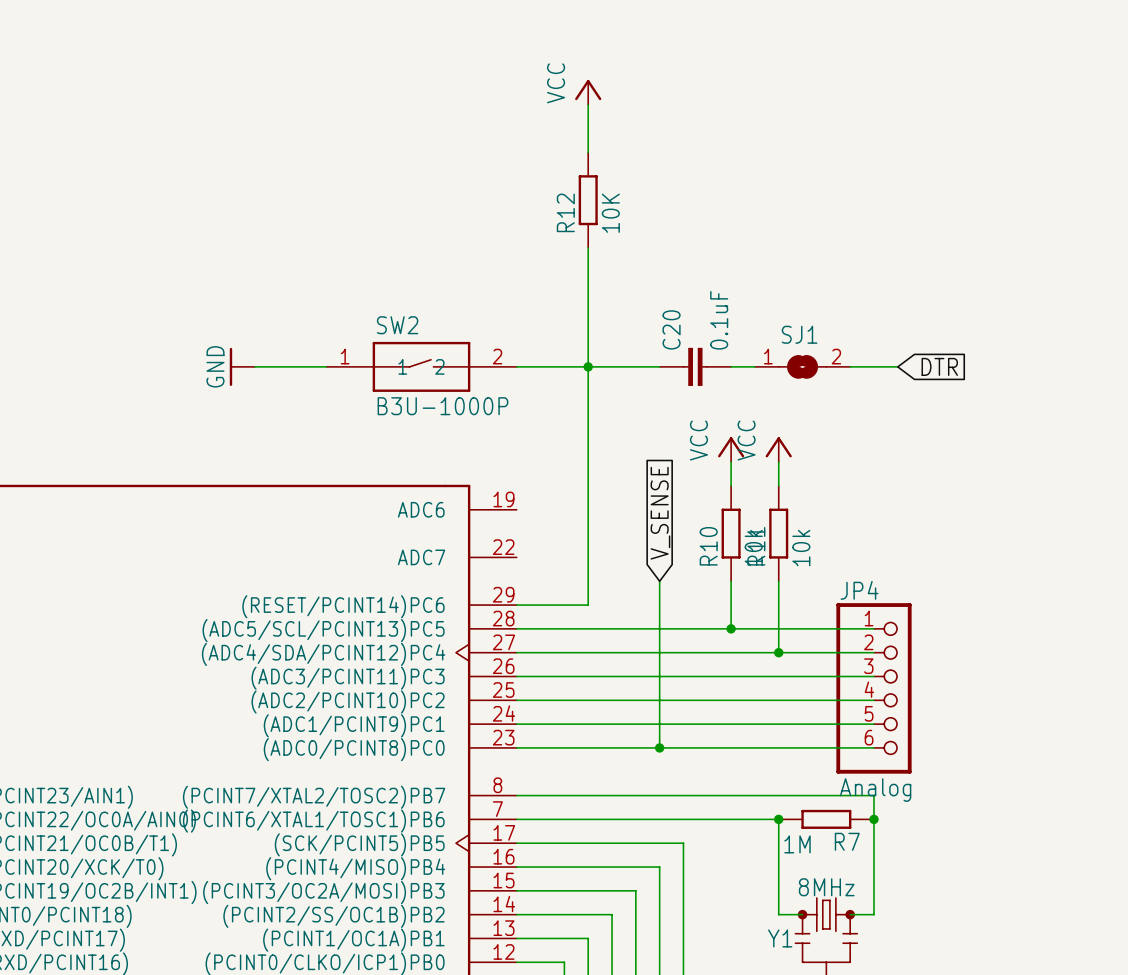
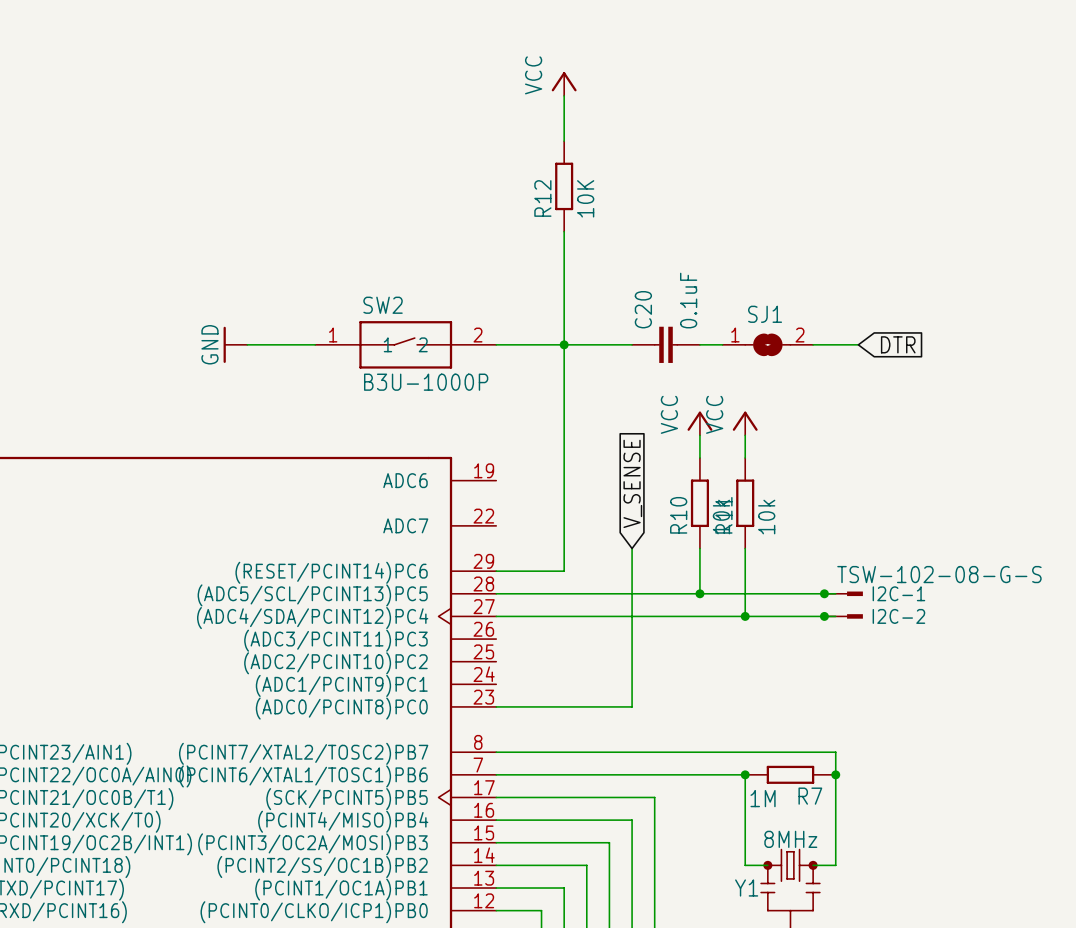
junction: none -> (824, 593)
I2C-1: none -> TSW-102-08-G-S (843, 593)
junction: none -> (824, 616)
I2C-2: none -> (843, 616)
wire: (516, 676) (873, 676) -> none
JP4: Analog (873, 688) -> none
wire: (516, 700) (873, 700) -> none
wire: (516, 724) (873, 724) -> none
wire: (659, 747) (873, 747) -> none
junction: (659, 747) -> none

